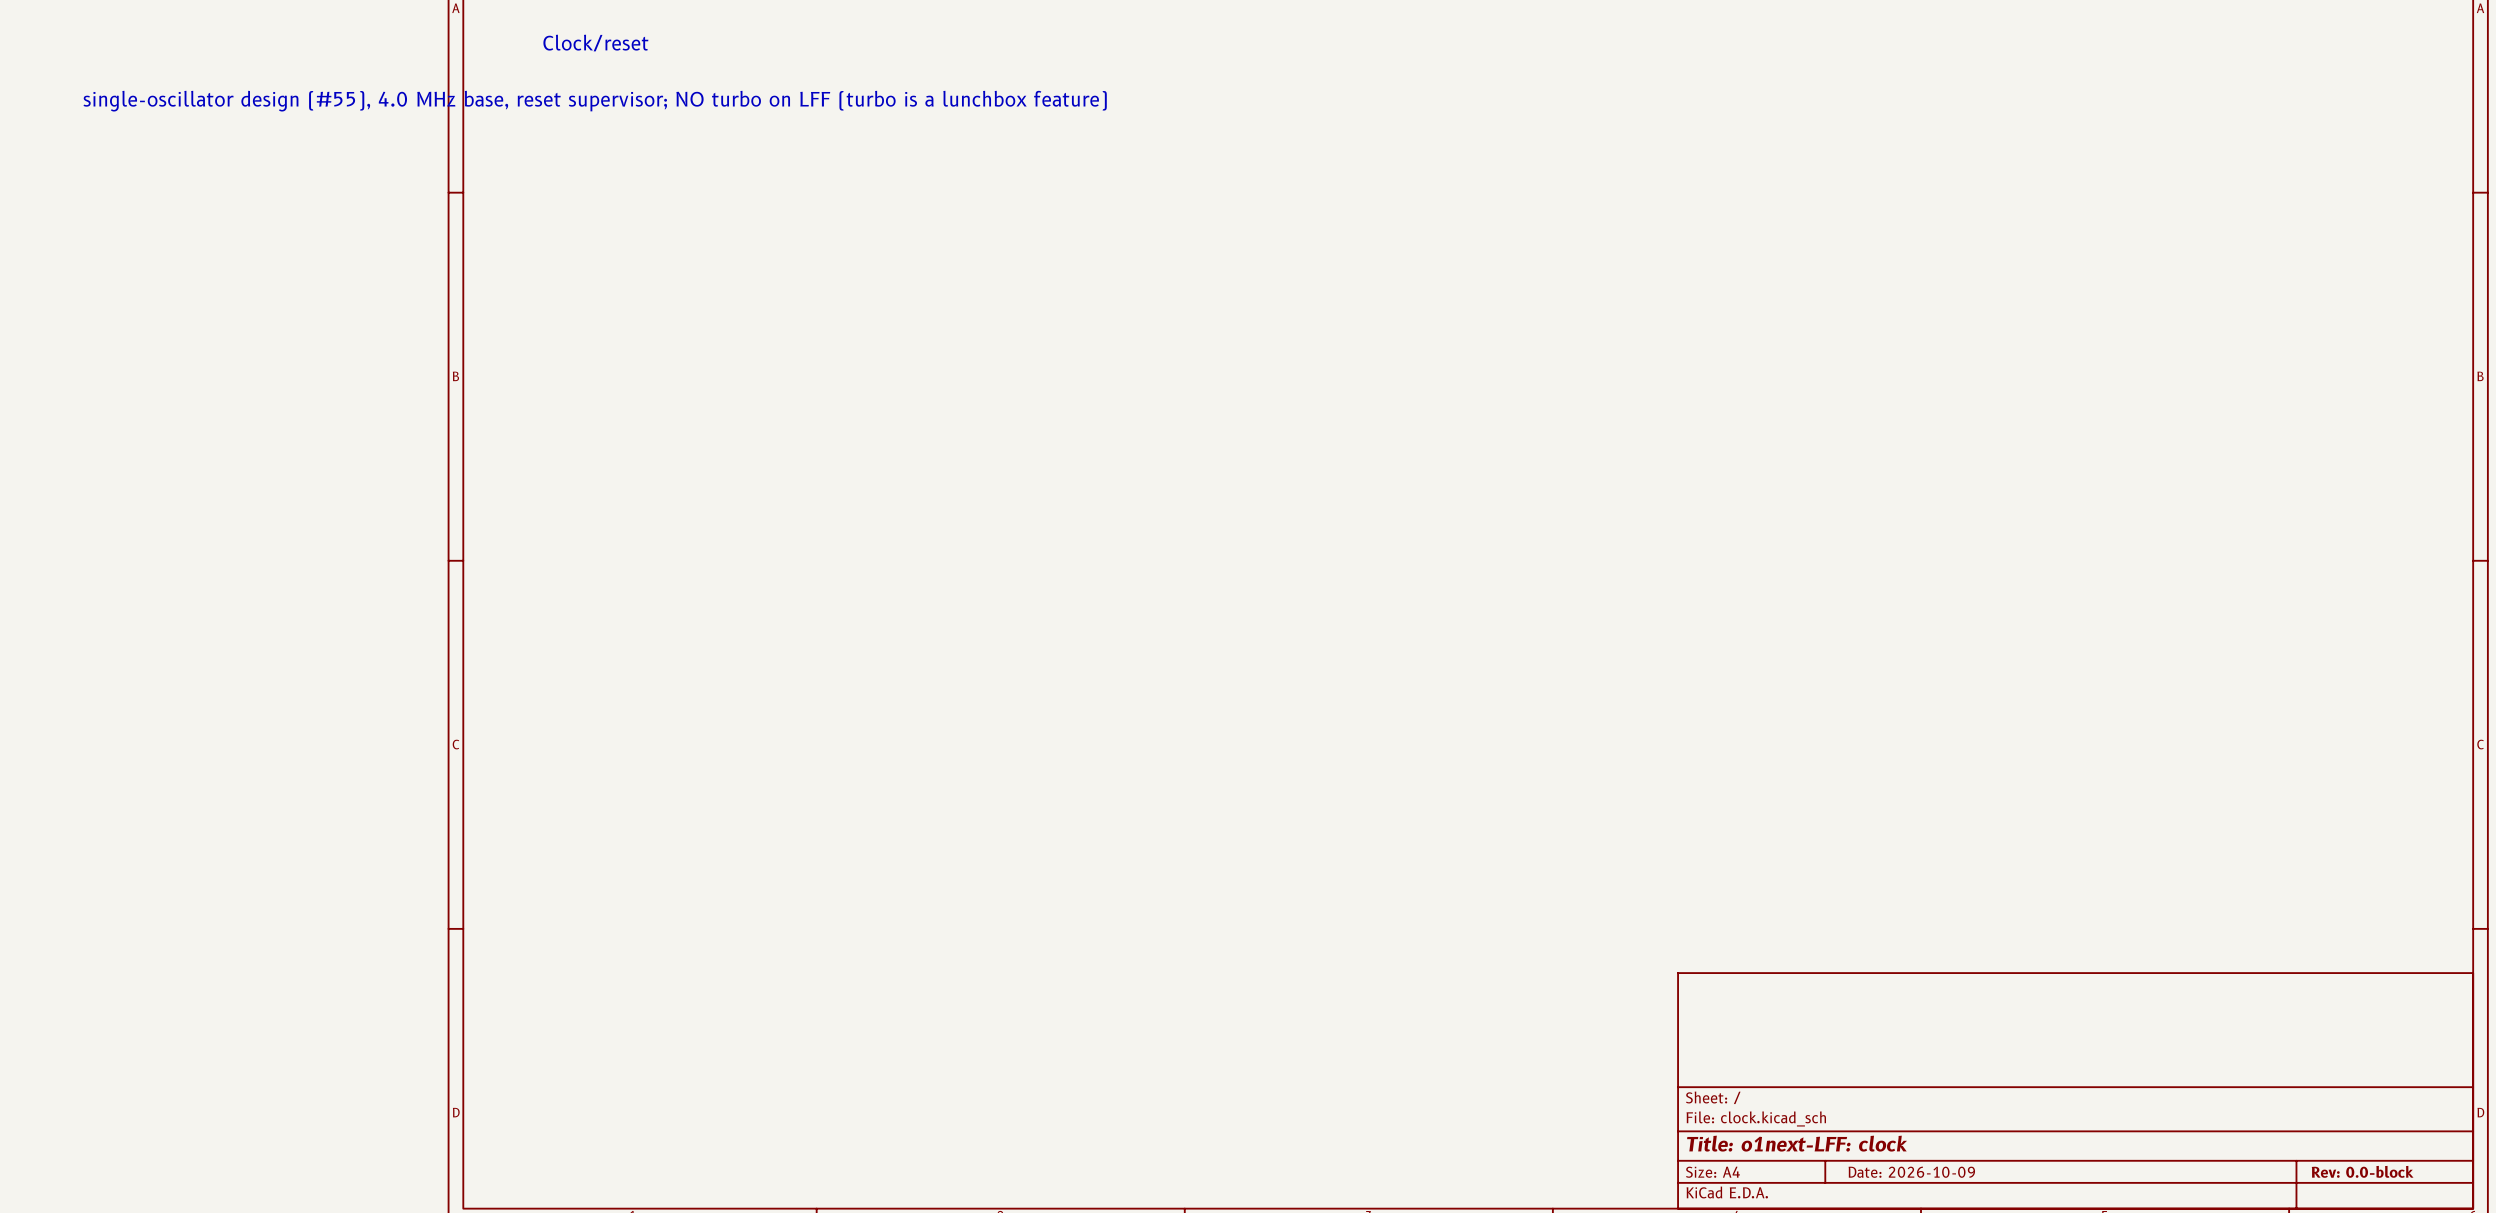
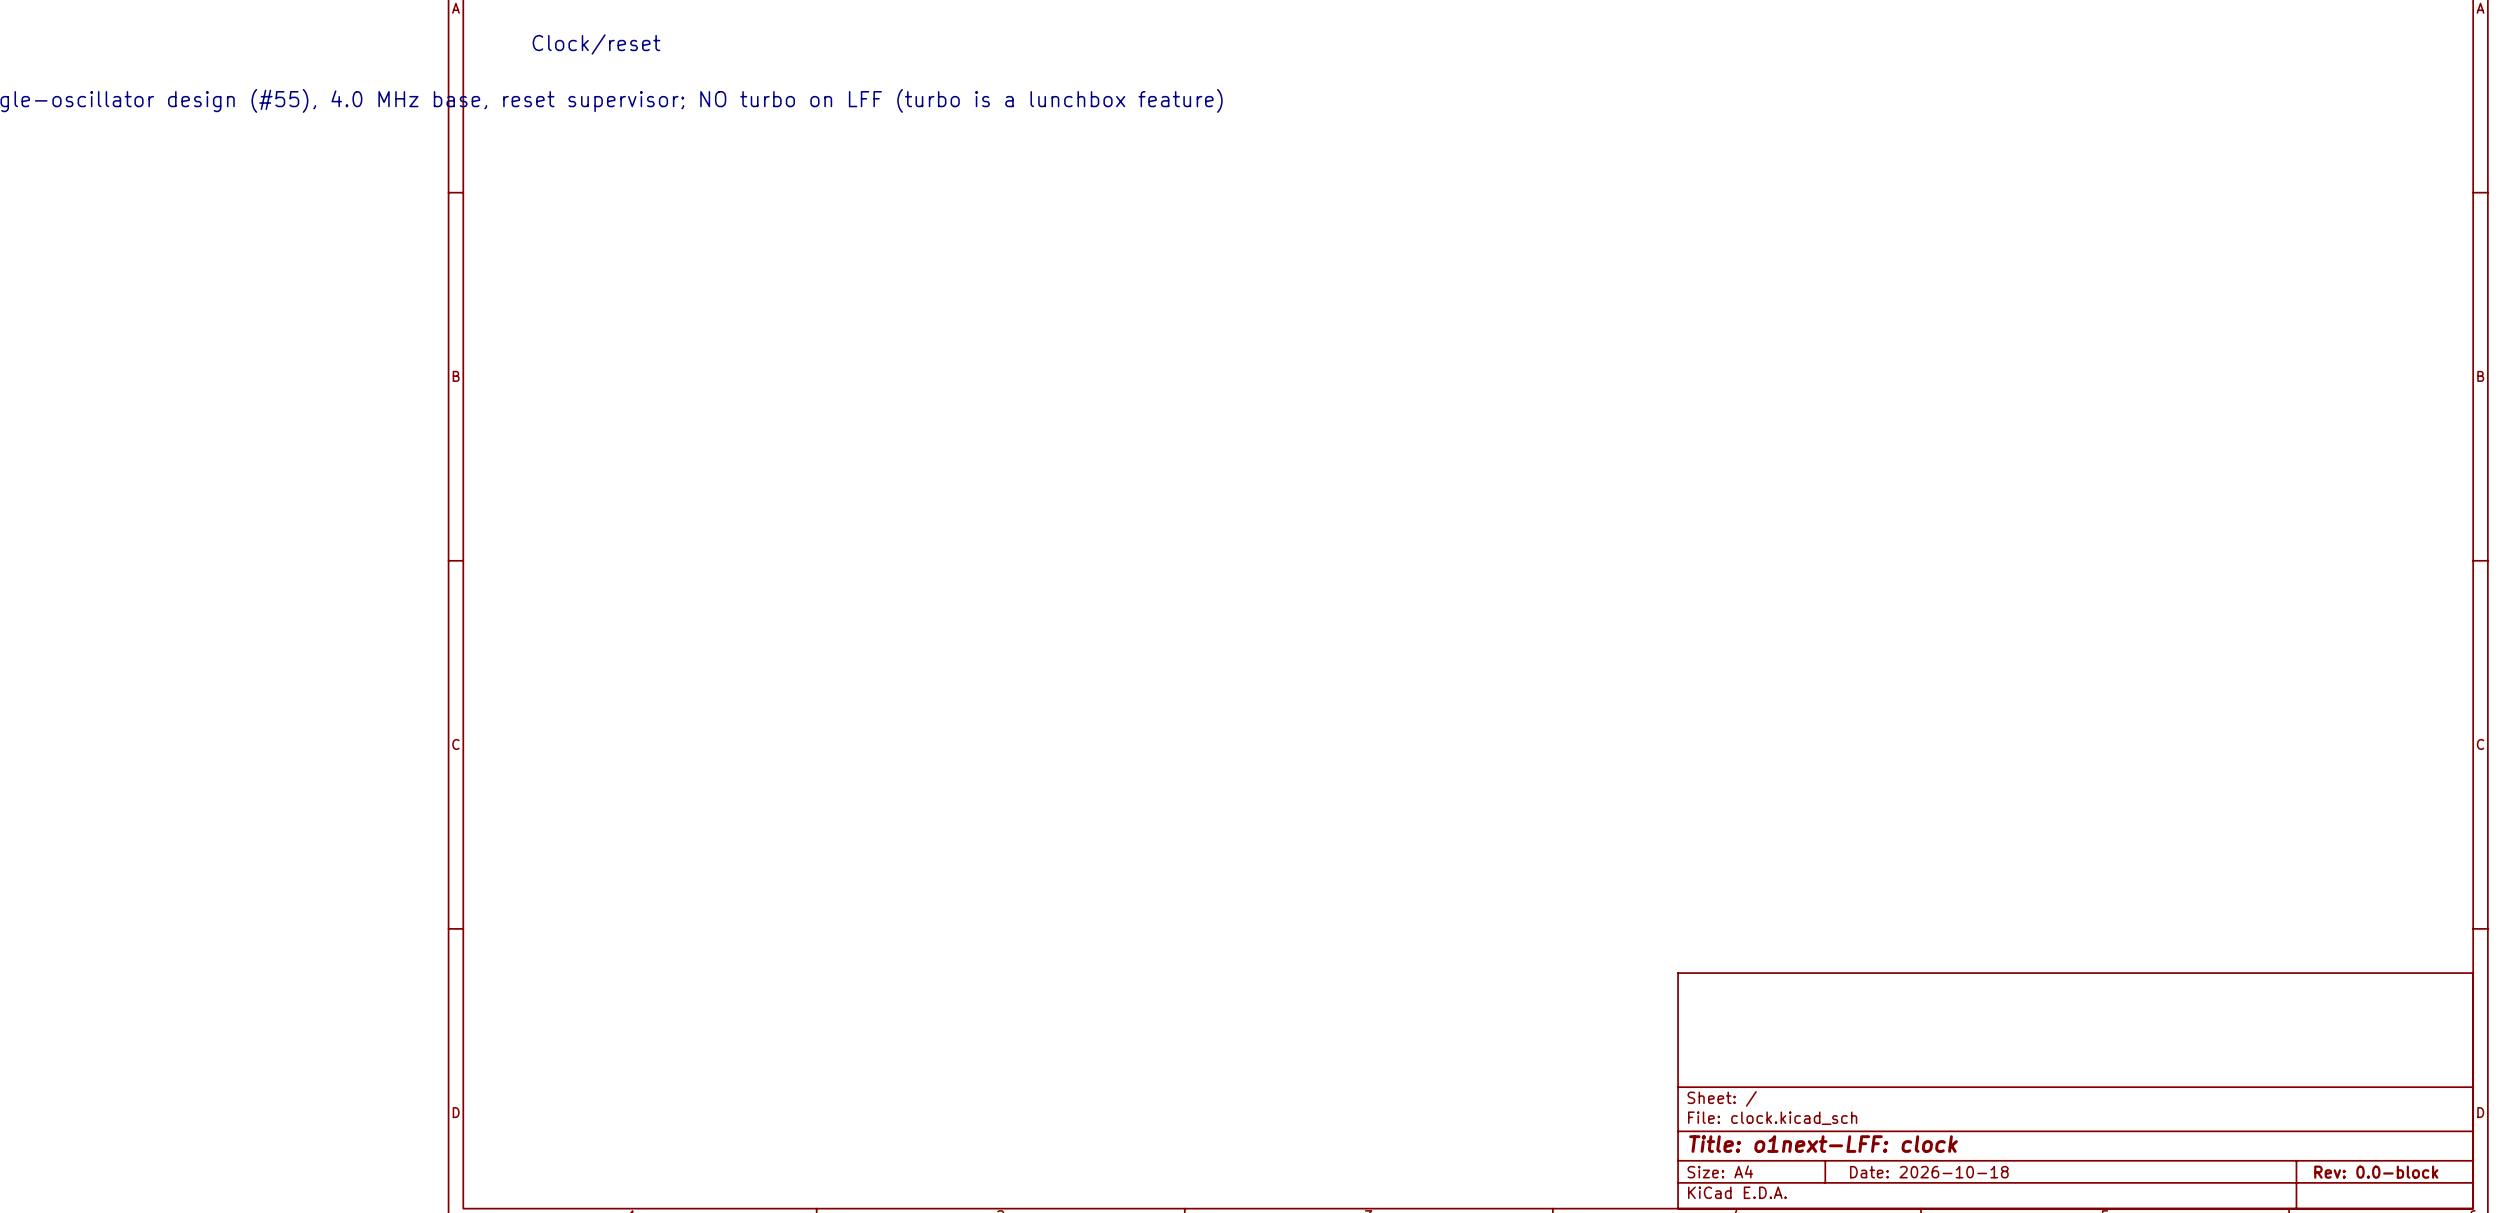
title block: Date: 2026-10-09 (1911, 1172) -> Date: 2026-10-18 (1929, 1172)

